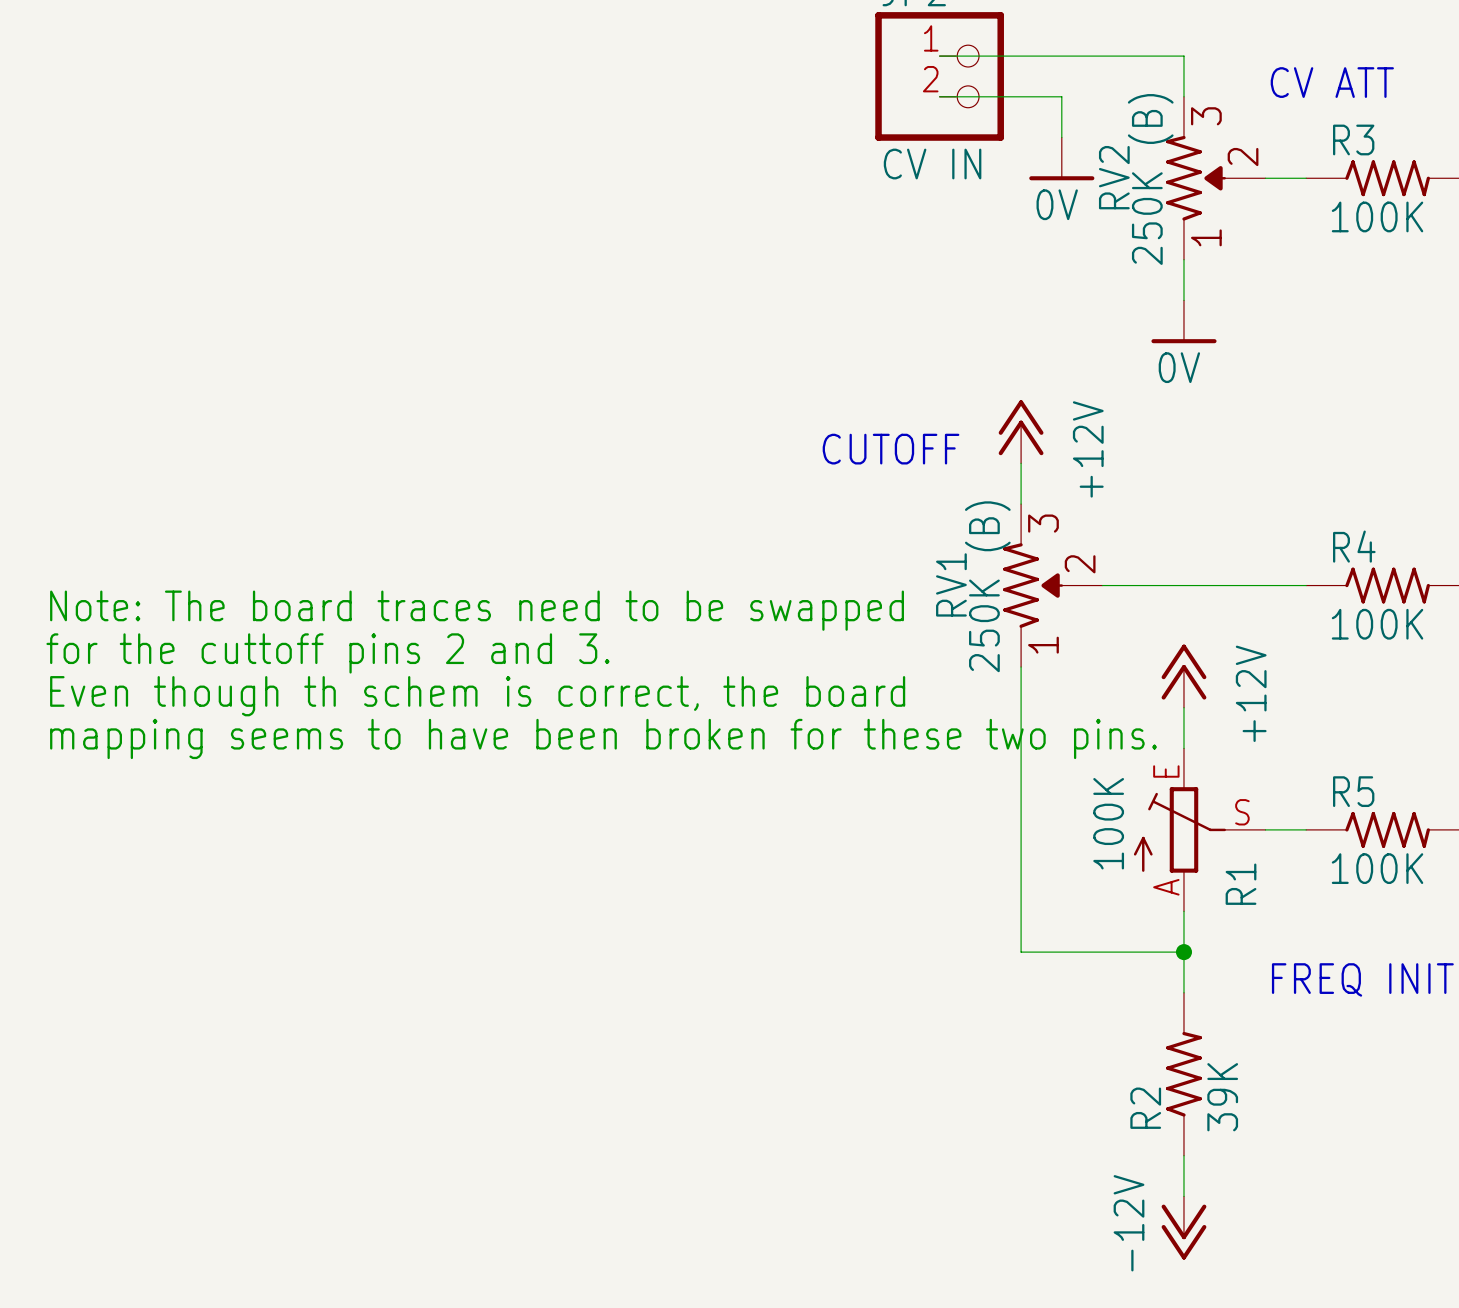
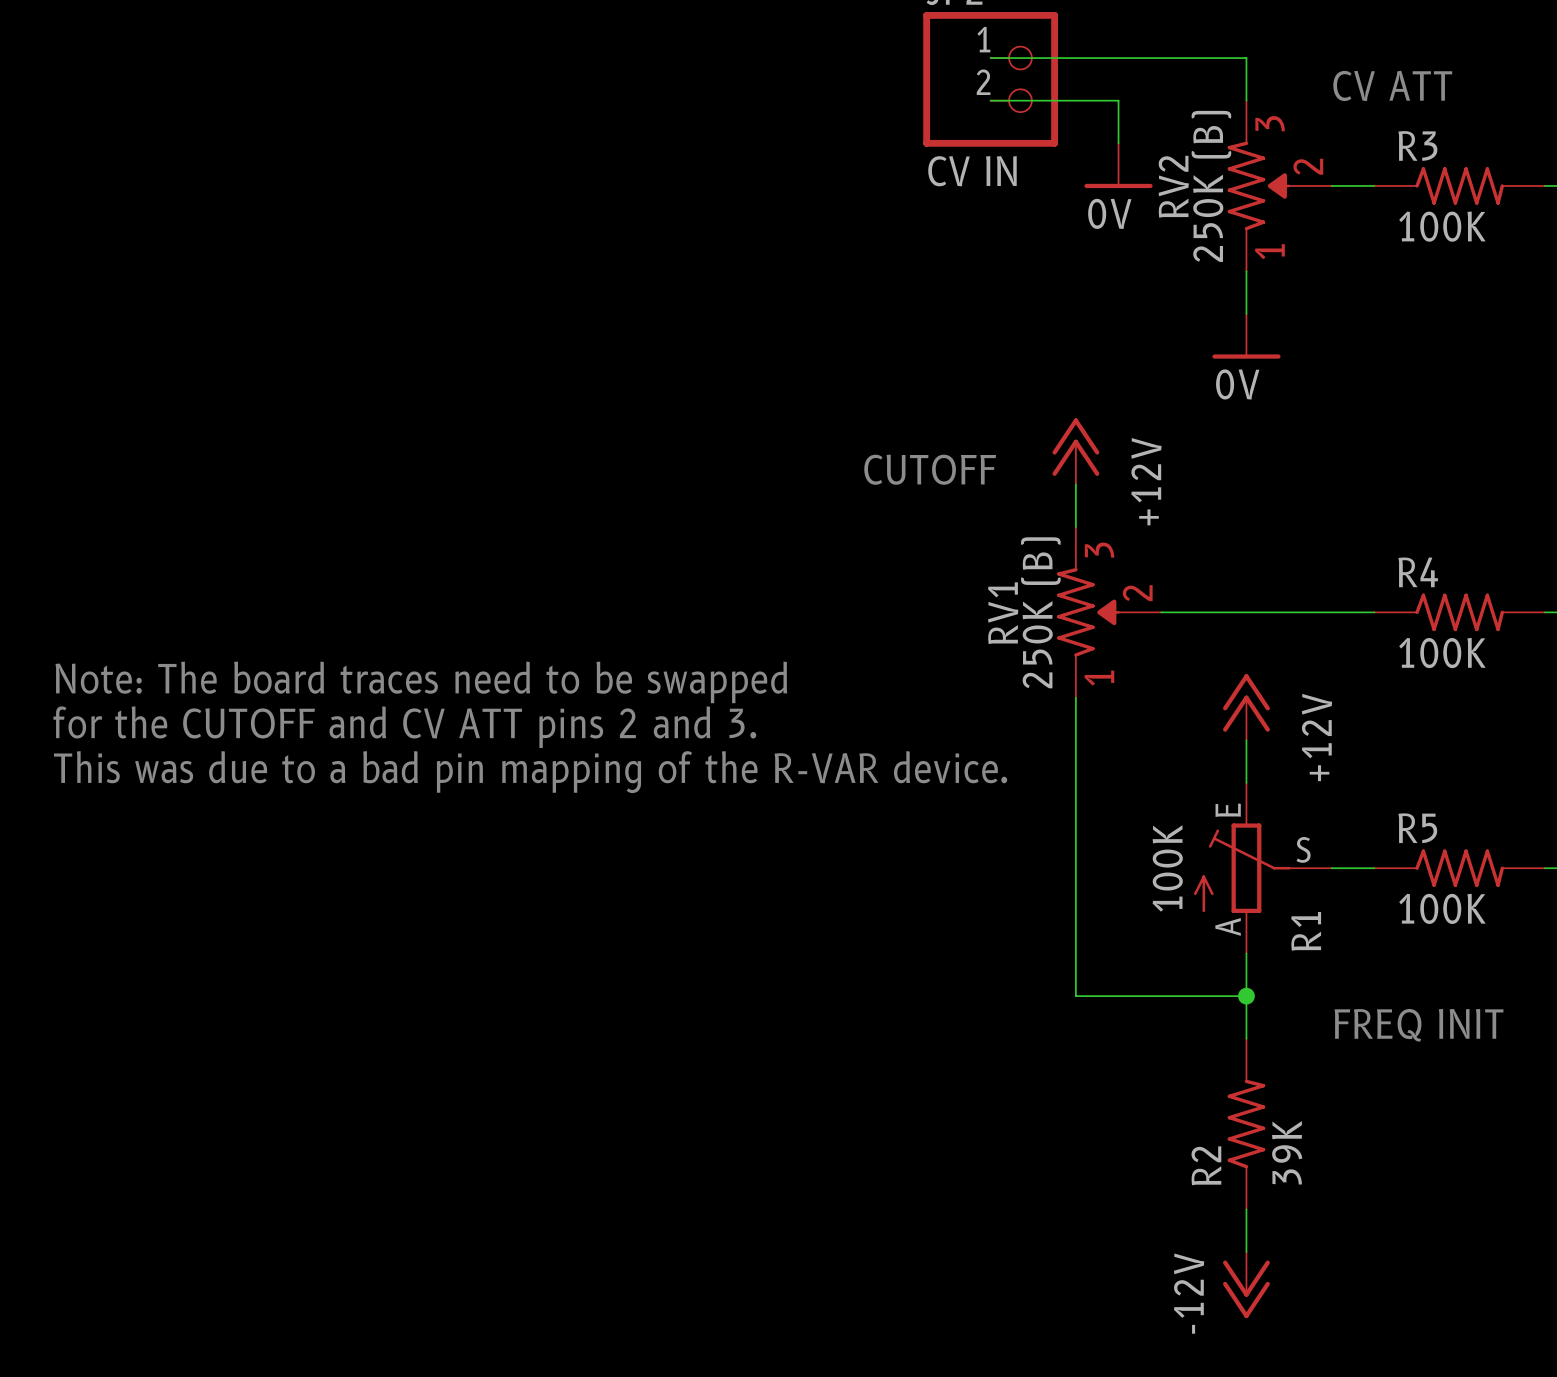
text: Note: The board traces need to be swapped (477, 610) -> none
text: for the cuttoff pins 2 and 3. (327, 653) -> Note: The board traces need to be swapped (421, 682)
text: Even though th schem is correct, the board (477, 696) -> for the CUTOFF and CV ATT pins 2 and 3. (404, 727)
text: mapping seems to have been broken for these two pins. (603, 738) -> This was due to a bad pin mapping of the R-VAR device. (530, 772)

